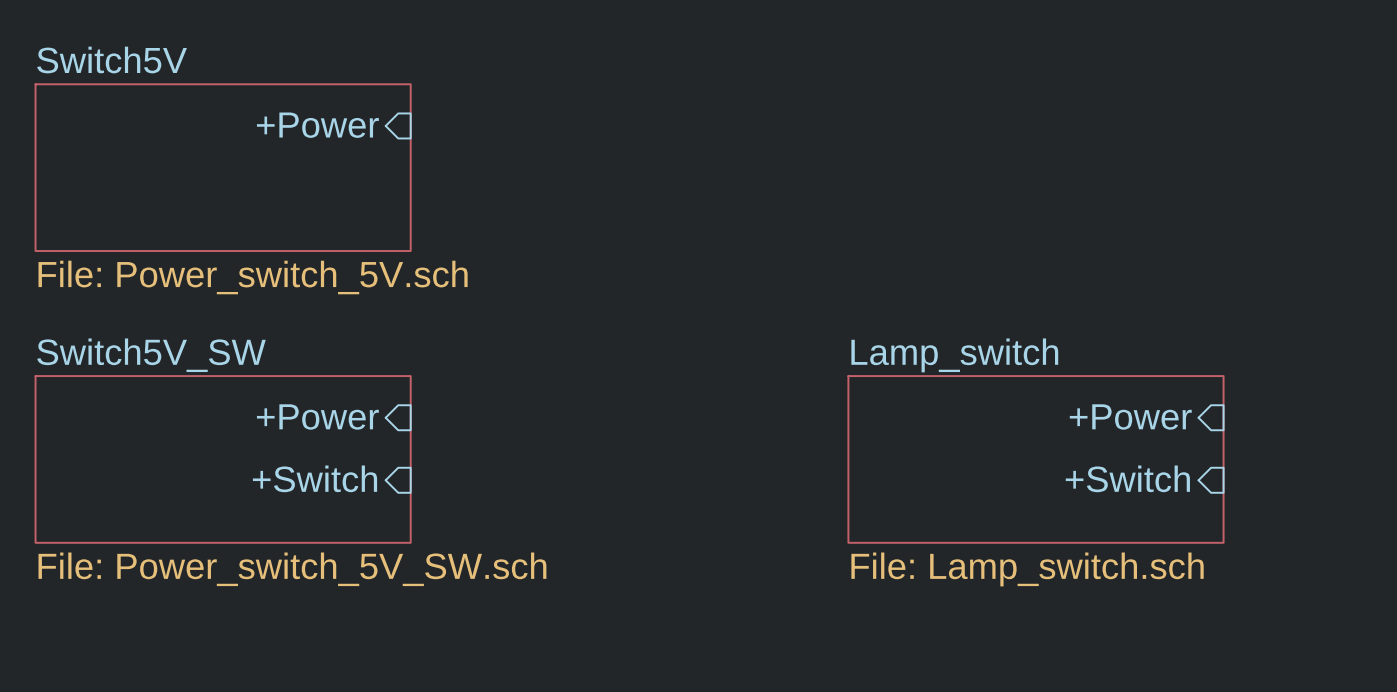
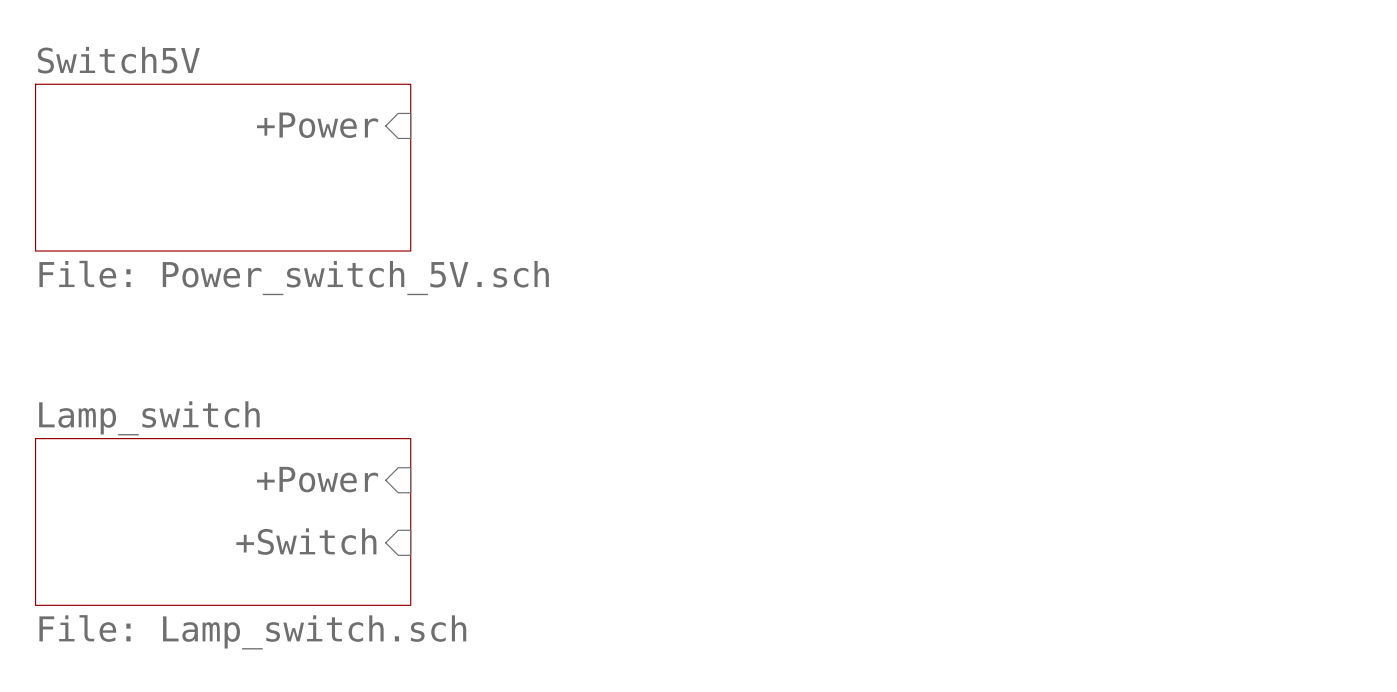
sheet pin: +Power (317, 416) -> none
sheet pin: +Power (1130, 416) -> none
sheet Switch5V_SW: File: Power_switch_5V_SW.sch (223, 459) -> none
sheet Lamp_switch: File: Lamp_switch.sch (1035, 459) -> none
sheet pin: +Switch (315, 478) -> +Power (317, 479)
sheet pin: +Switch (1127, 478) -> none
sheet Lamp_switch: none -> File: Lamp_switch.sch (223, 521)
sheet pin: none -> +Switch (306, 541)

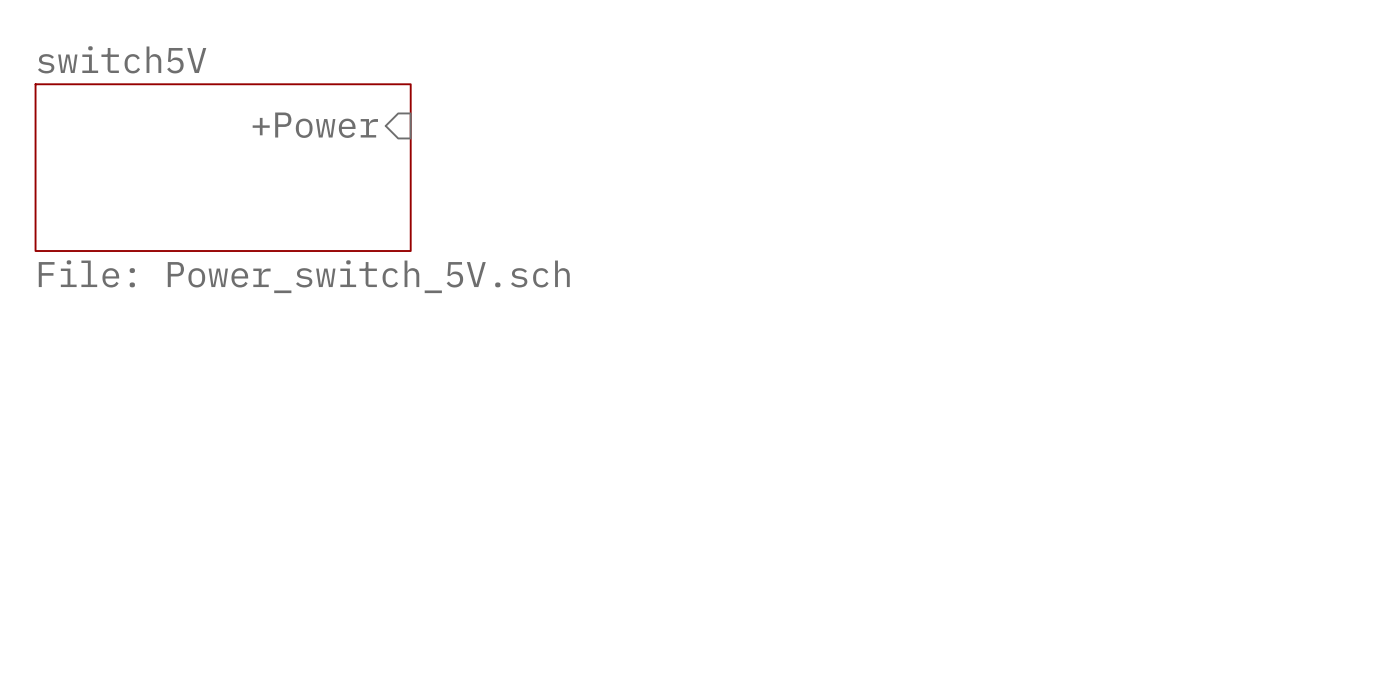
sheet Switch5V name: Switch5V (118, 60) -> switch5V (122, 59)
sheet pin: +Power (317, 479) -> none
sheet Lamp_switch: File: Lamp_switch.sch (223, 521) -> none
sheet pin: +Switch (306, 541) -> none

